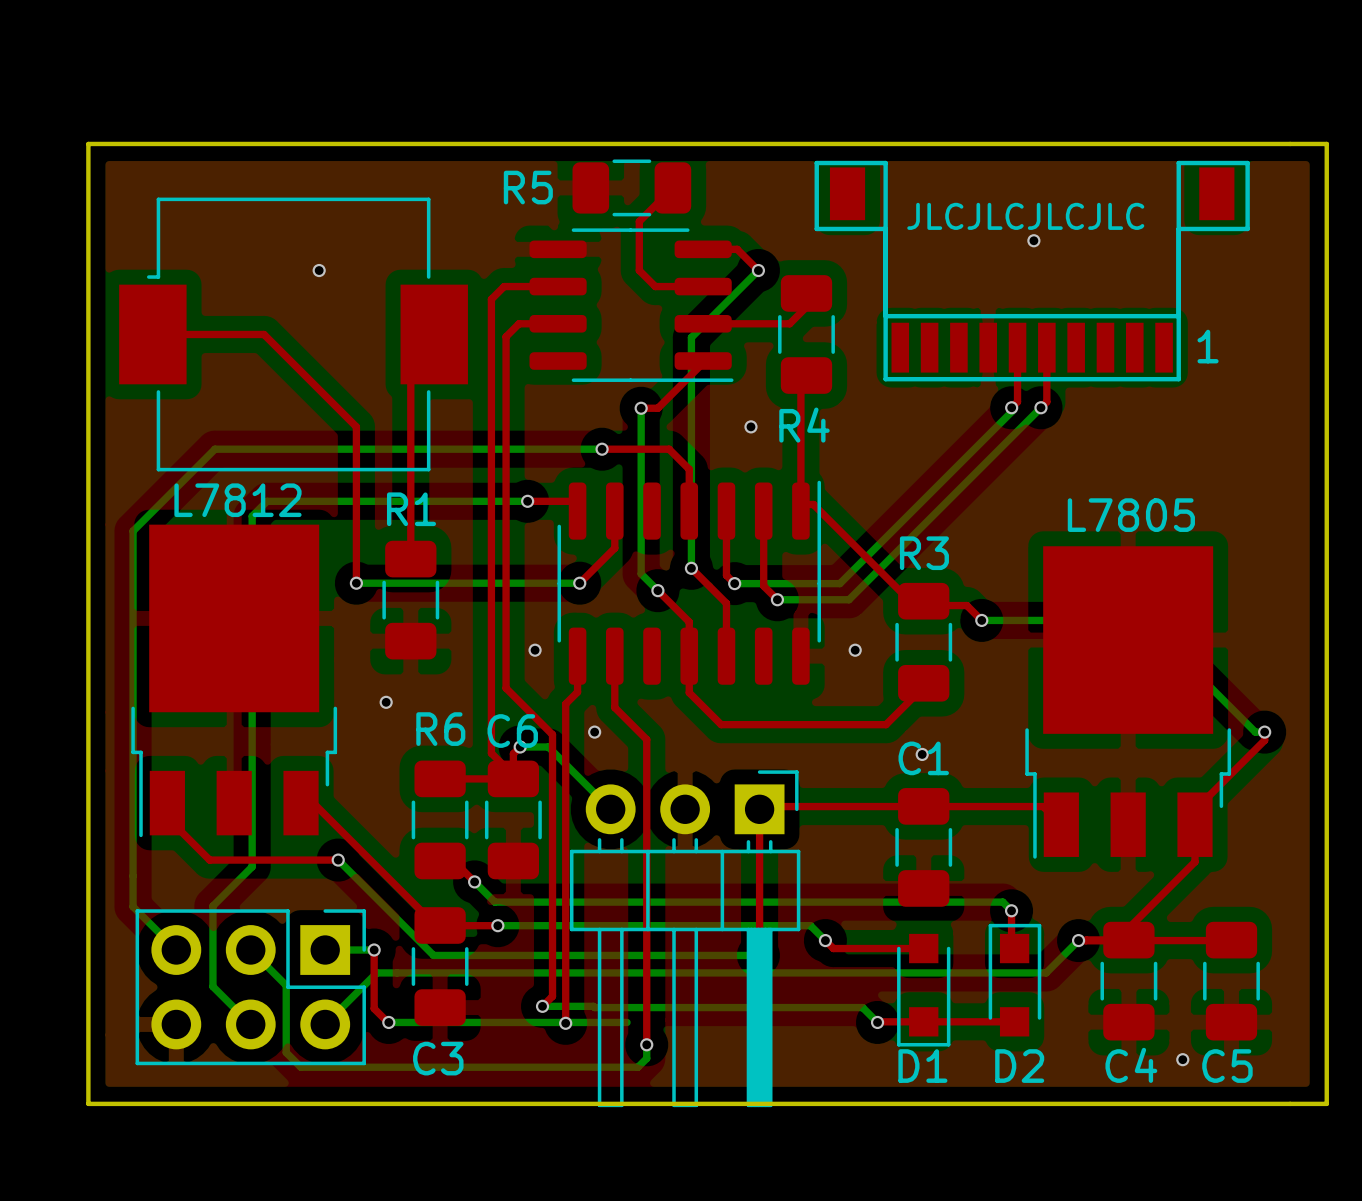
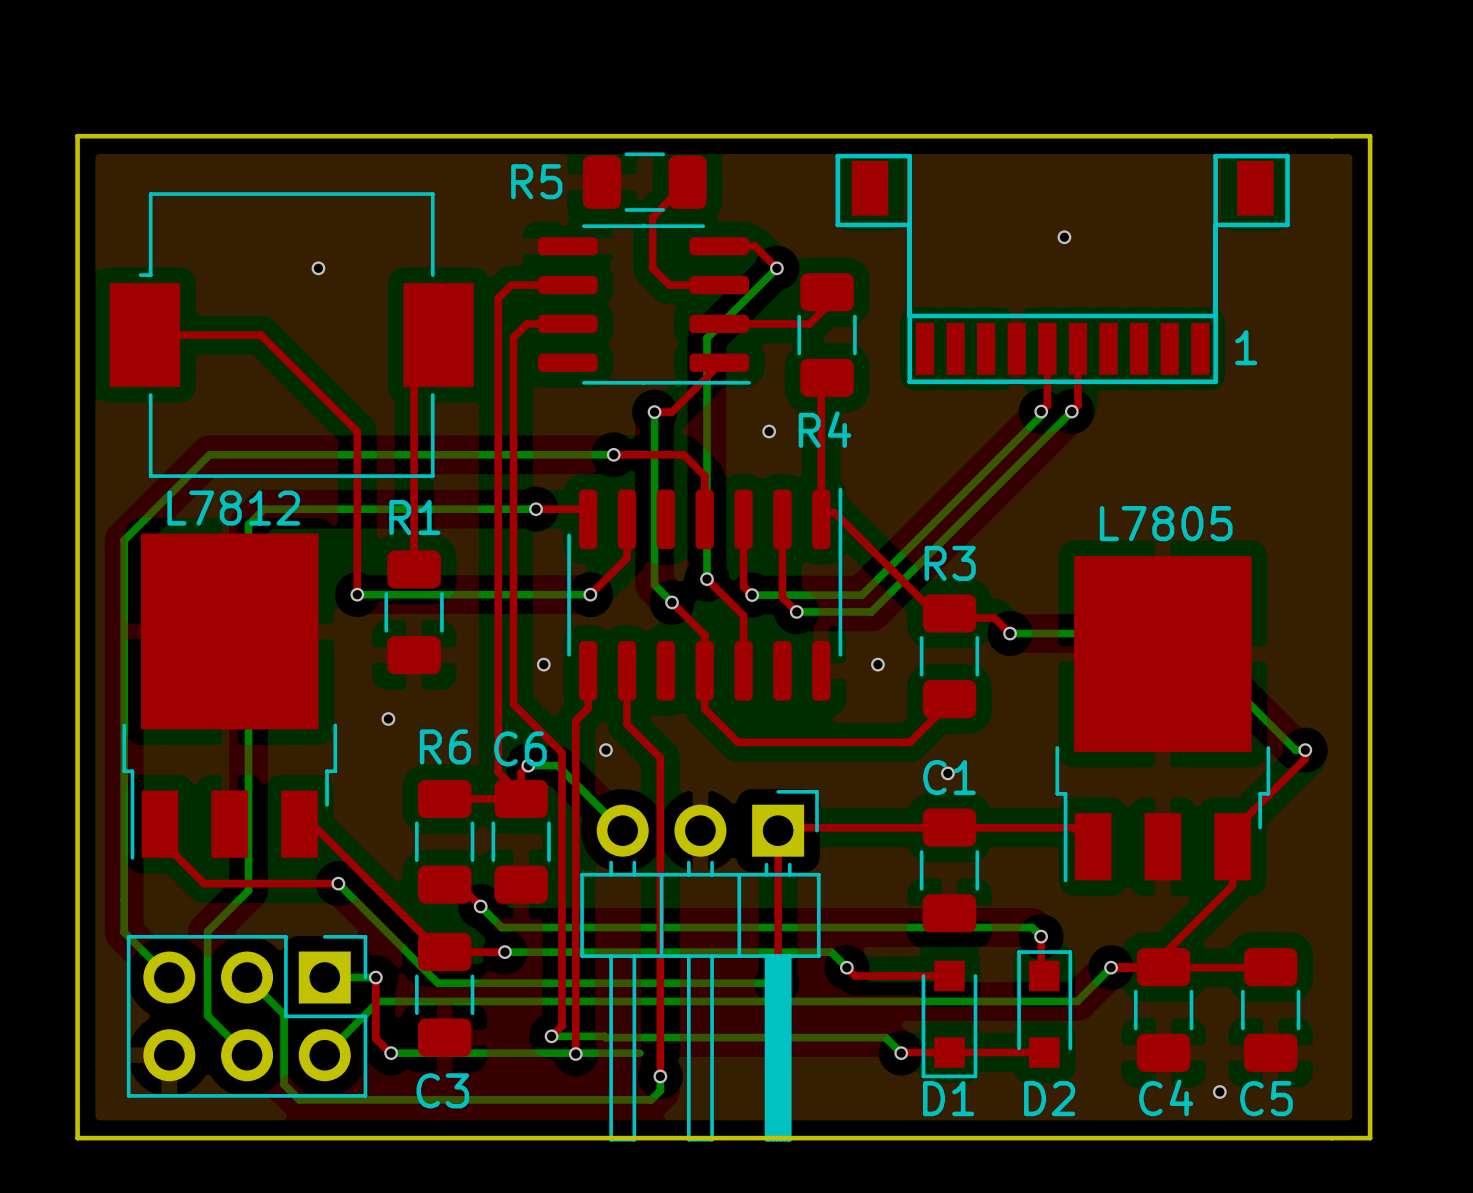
text: JLCJLCJLCJLC (1025, 216) -> none

